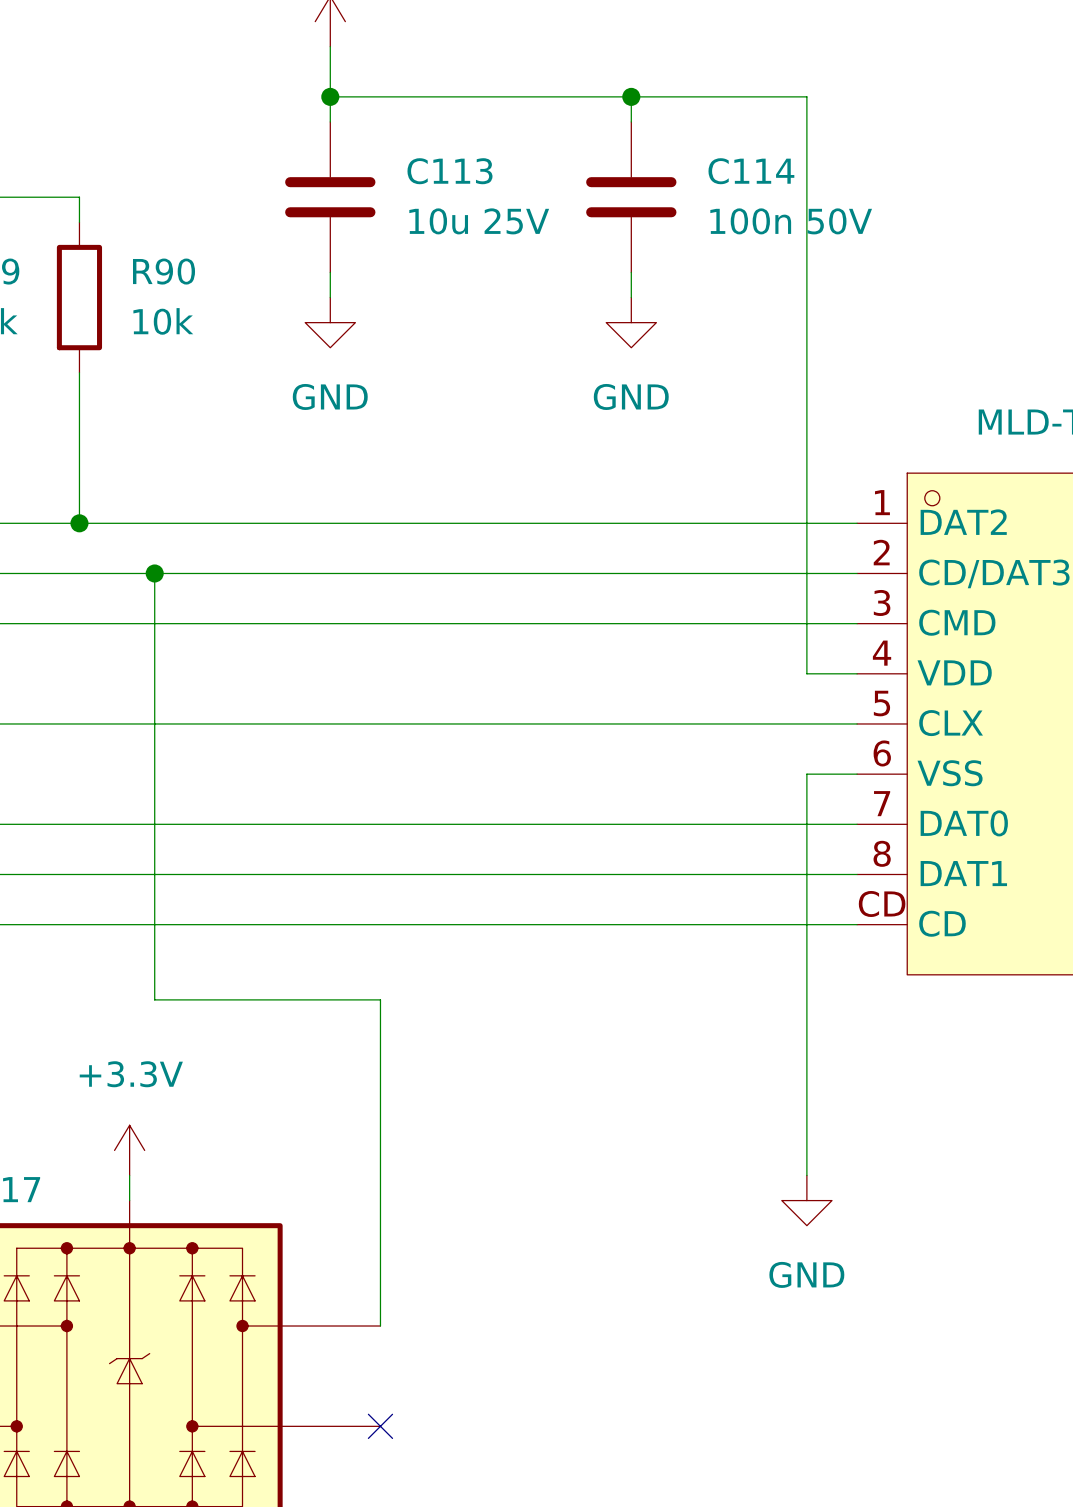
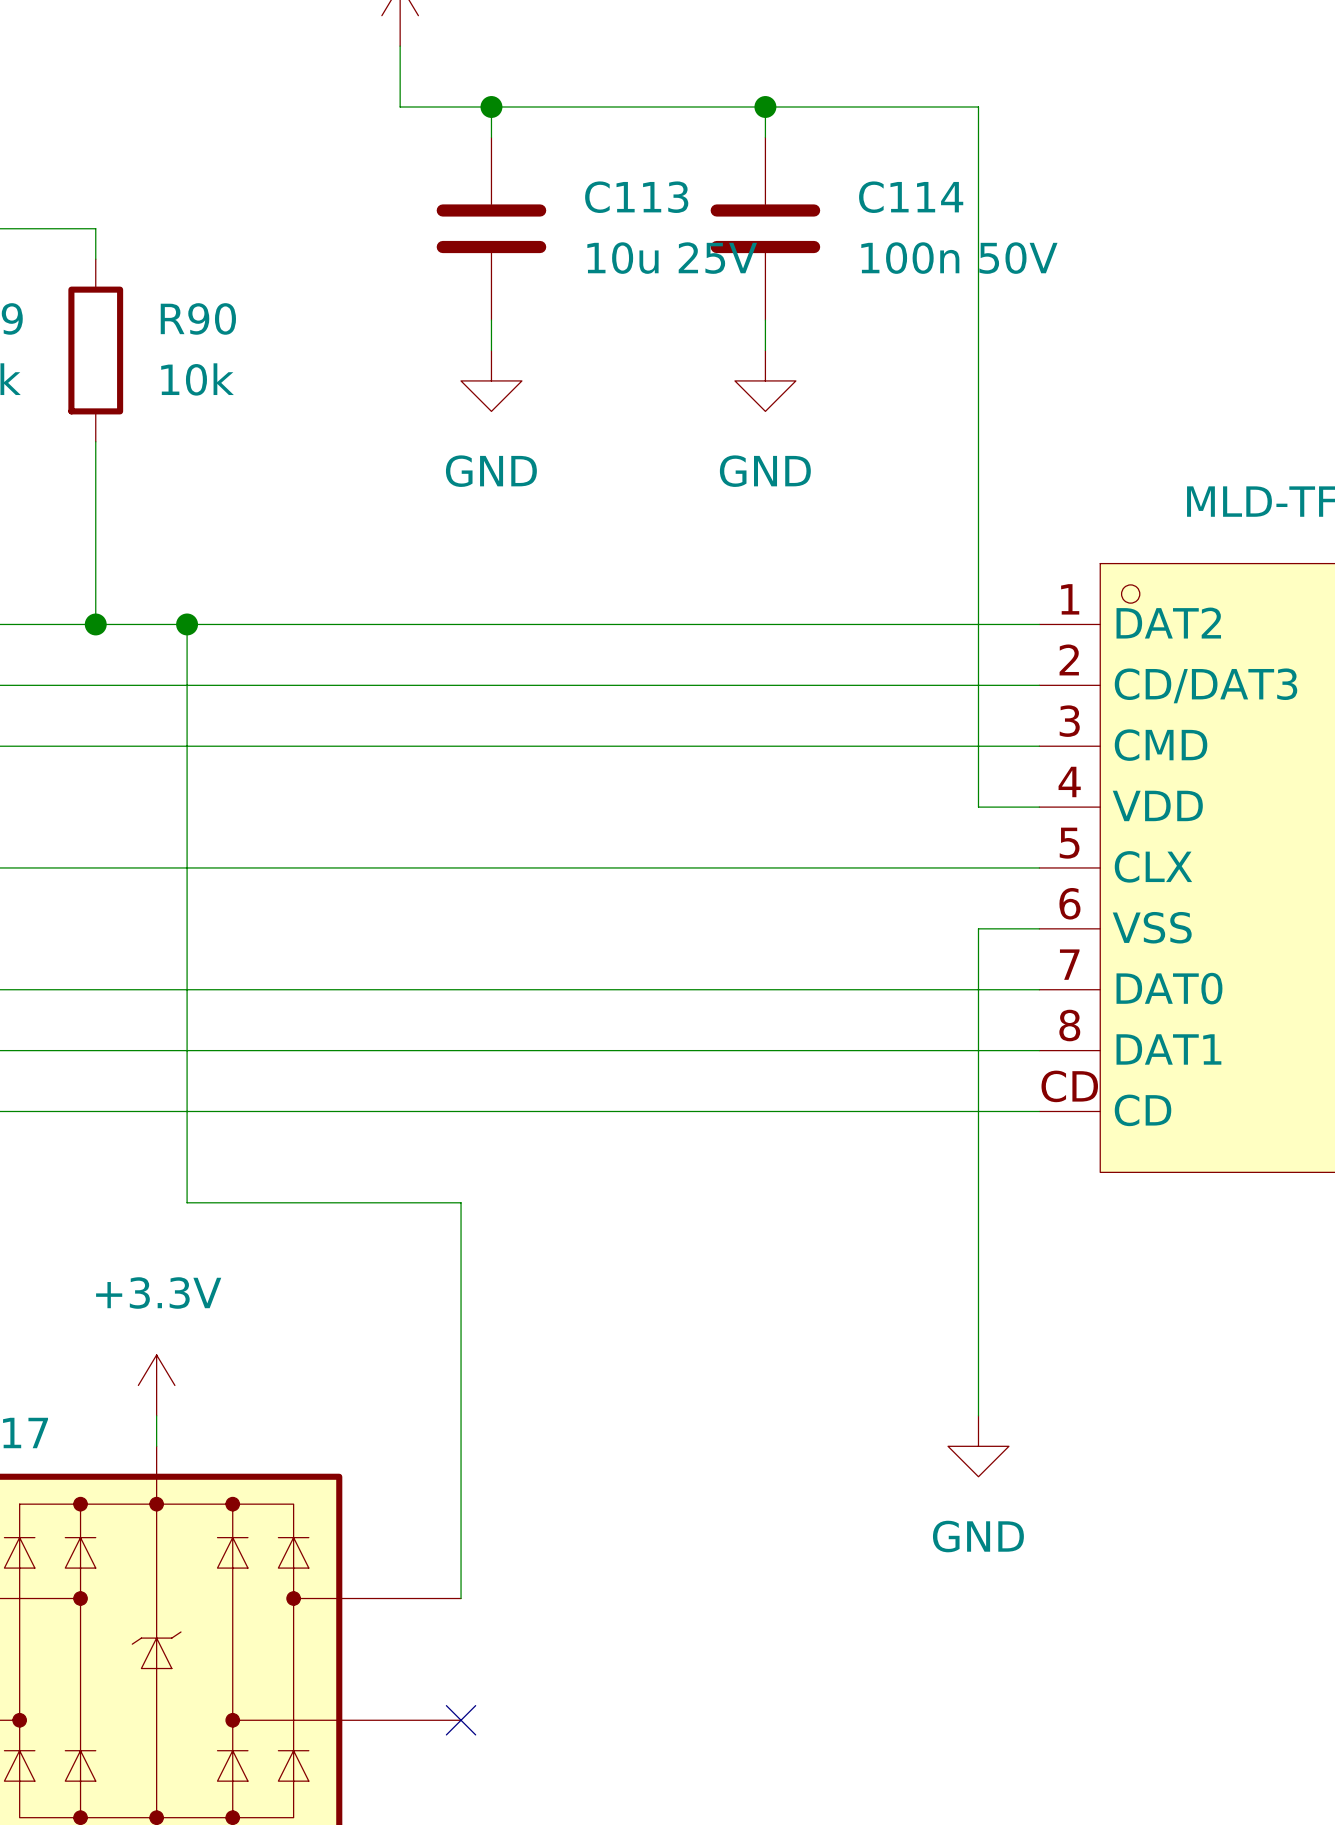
wire: (330, 96) (330, 121) -> (491, 106) (491, 137)
junction position: (330, 96) -> (491, 106)
C113 position: (330, 197) -> (491, 228)
wire: (330, 272) (330, 297) -> (491, 320) (491, 350)
power symbol position: GND (330, 322) -> GND (491, 380)
wire: none -> (187, 624) (187, 685)
junction position: (154, 573) -> (187, 624)

